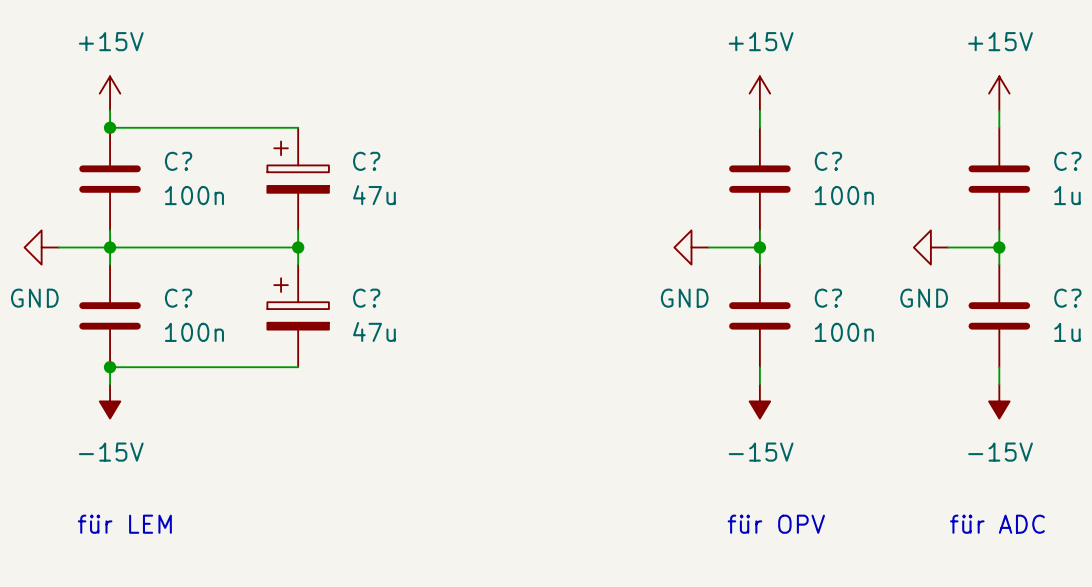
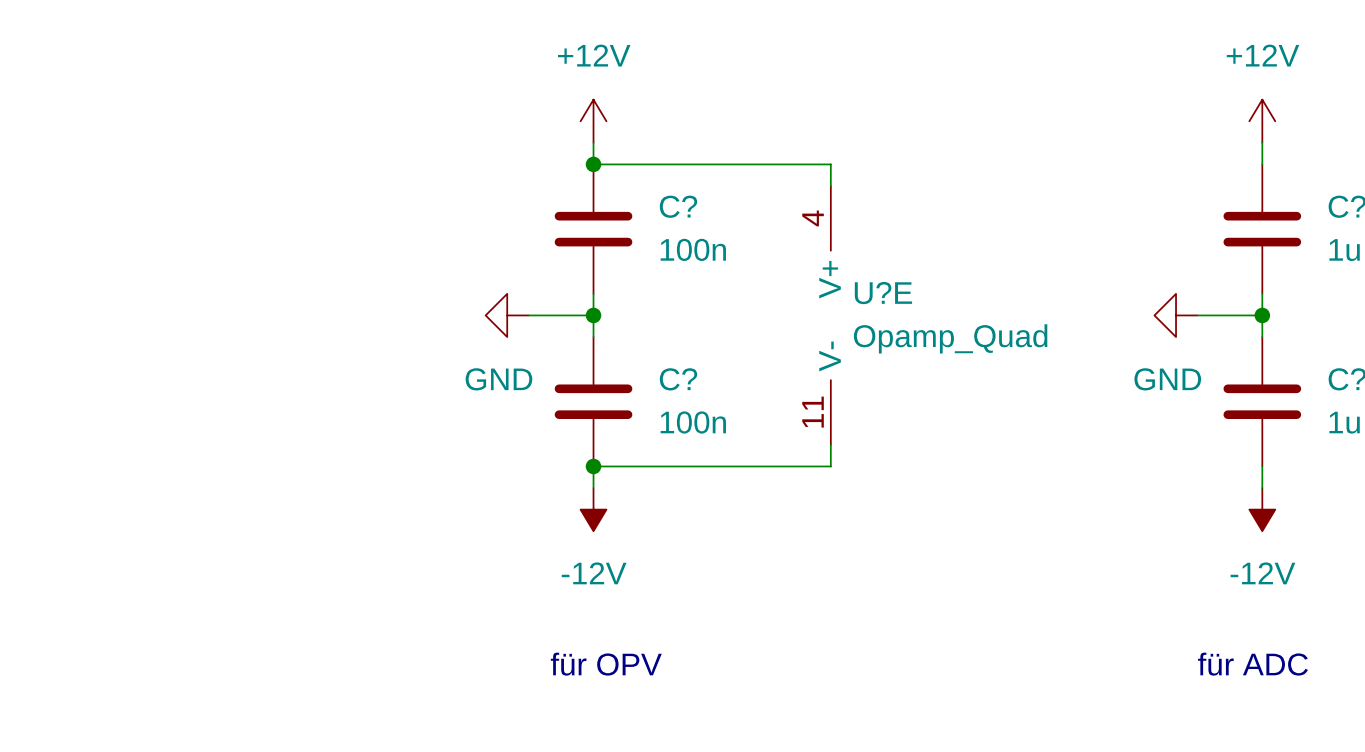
power symbol: +15V (110, 93) -> none
power symbol: none -> +12V (593, 121)
power symbol: +15V (759, 93) -> none
power symbol: +15V (999, 93) -> +12V (1262, 121)
wire: (110, 110) (110, 127) (298, 127) -> none
wire: none -> (593, 142) (593, 164) (830, 164) (830, 185)
wire: (759, 110) (759, 127) -> none
junction: (110, 127) -> none
junction: none -> (593, 164)
C?: 100n (110, 179) -> none
C?: 47u (298, 179) -> none
C?: none -> 100n (593, 229)
C?: 100n (759, 179) -> none
wire: (110, 230) (110, 264) -> none
wire: (298, 230) (298, 264) -> none
wire: (759, 230) (759, 264) -> (593, 293) (593, 337)
power symbol: GND (41, 247) -> none
wire: (58, 247) (298, 247) -> none
junction: (110, 247) -> none
junction: (298, 247) -> none
power symbol: none -> GND (507, 315)
junction: none -> (593, 315)
U?E: none -> Opamp_Quad (830, 315)
power symbol: GND (691, 247) -> none
wire: (708, 247) (759, 247) -> (528, 315) (593, 315)
junction: (759, 247) -> none
C?: 100n (110, 315) -> none
C?: 47u (298, 315) -> none
C?: none -> 100n (593, 401)
C?: 100n (759, 315) -> none
wire: none -> (830, 444) (830, 466) (593, 466) (593, 488)
junction: (110, 367) -> none
wire: (298, 367) (110, 367) (110, 384) -> none
junction: none -> (593, 466)
wire: (759, 367) (759, 384) -> none
power symbol: -15V (110, 401) -> none
power symbol: none -> -12V (593, 509)
power symbol: -15V (759, 401) -> none
power symbol: -15V (999, 401) -> -12V (1262, 509)
text: für LEM (124, 524) -> none
text position: für OPV (776, 524) -> für OPV (606, 664)

